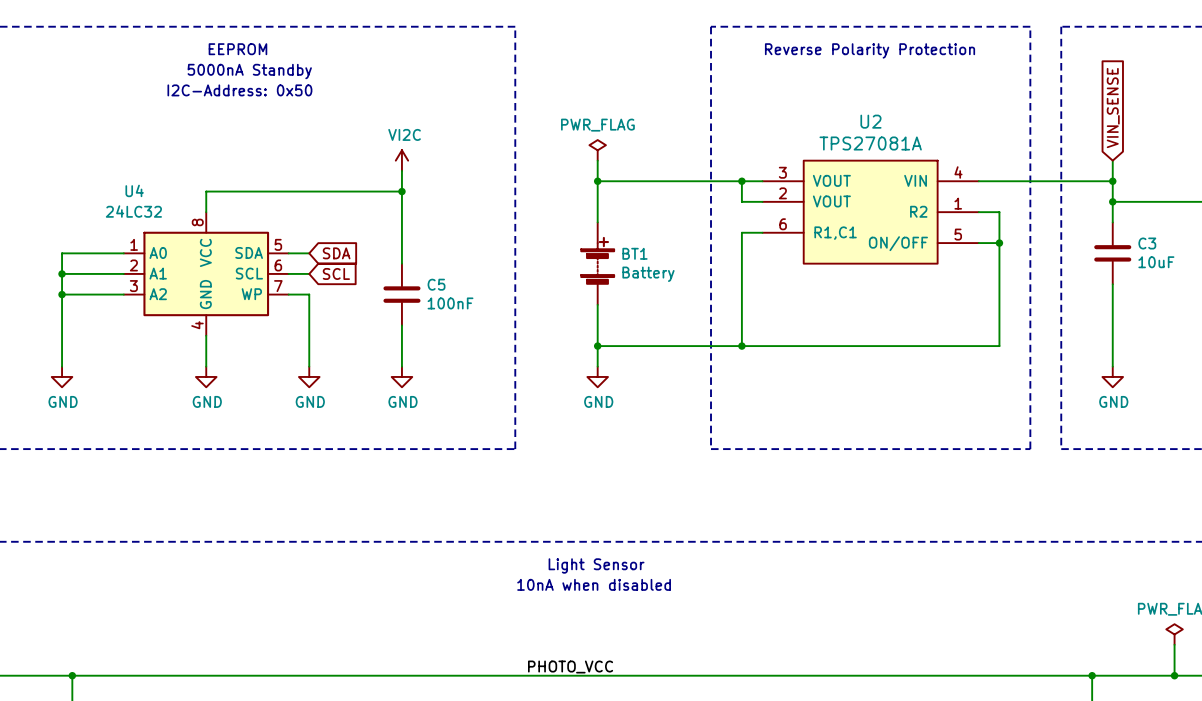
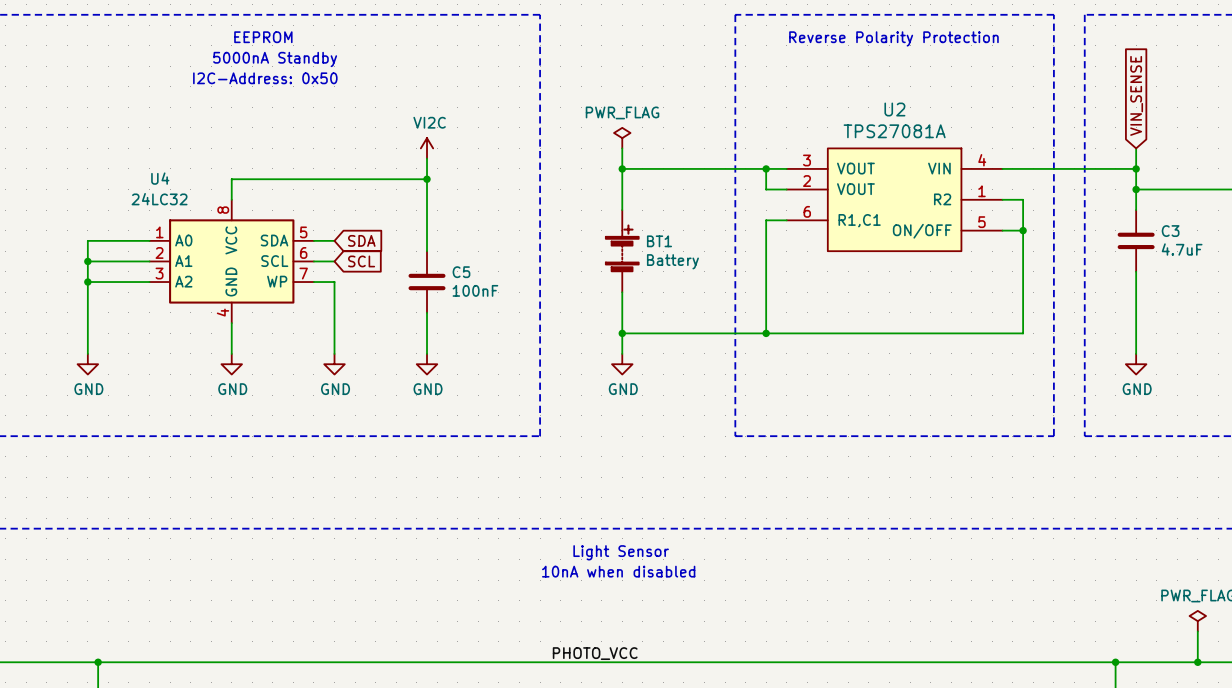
C3 value: 10uF (1156, 262) -> 4.7uF (1182, 249)

